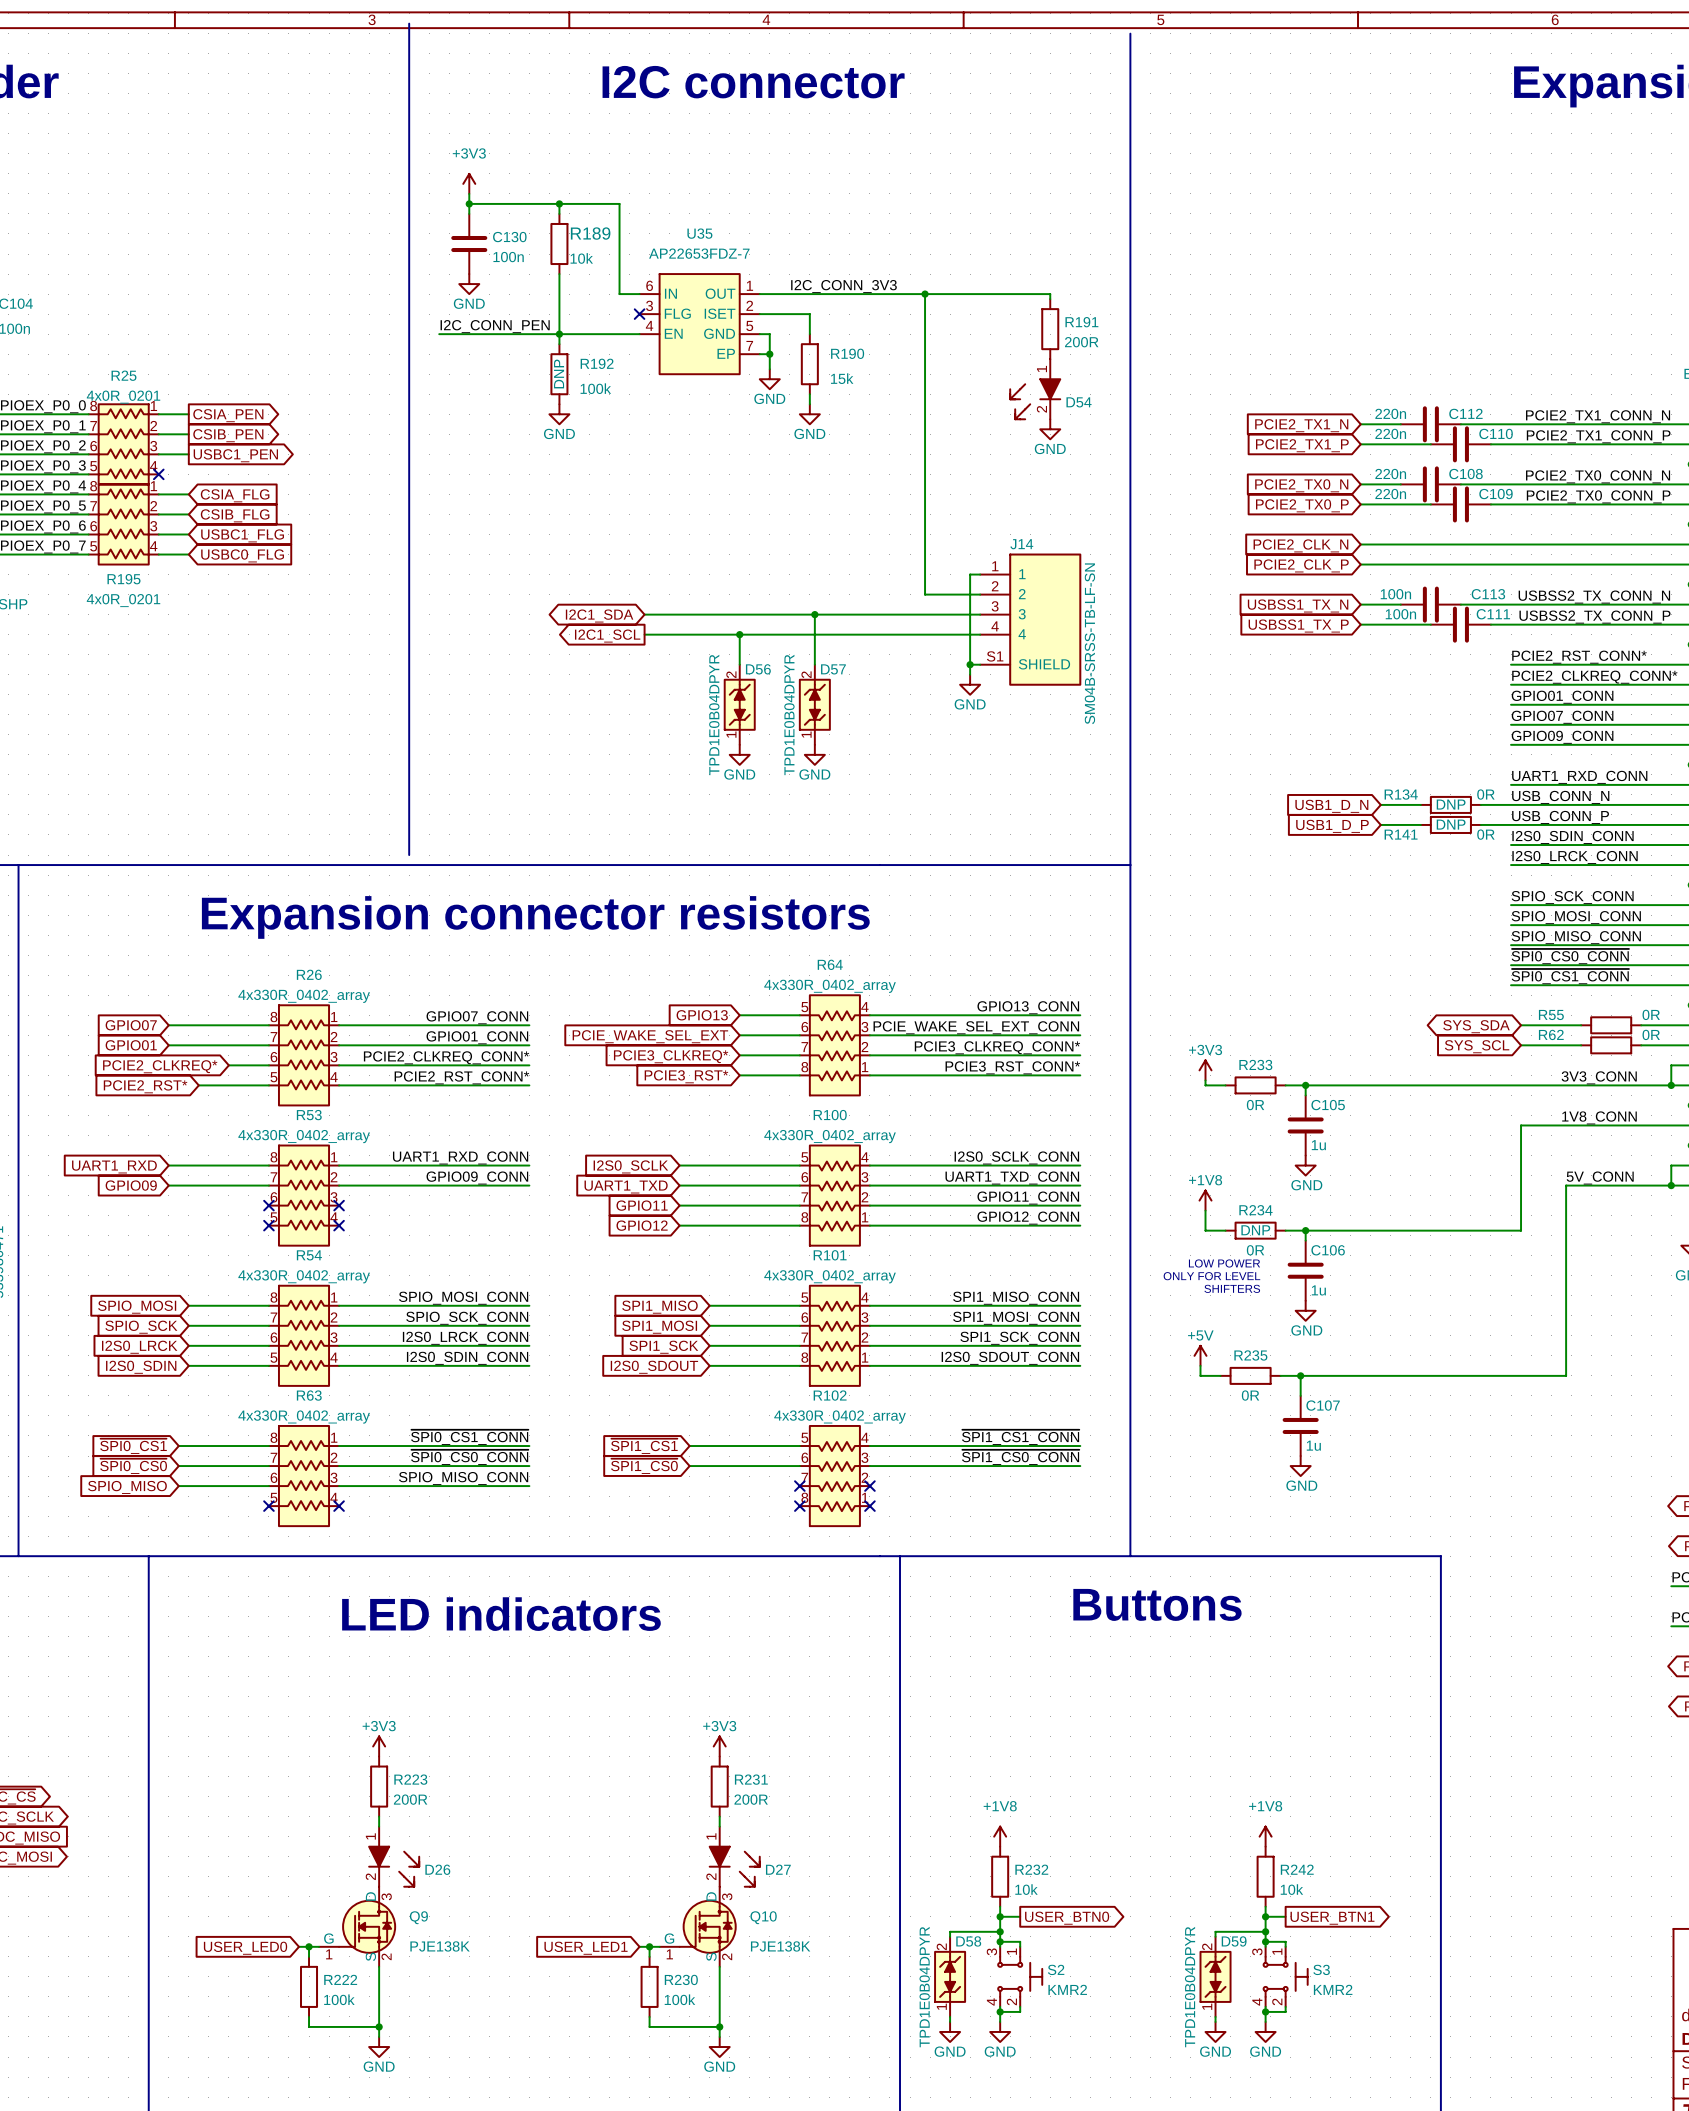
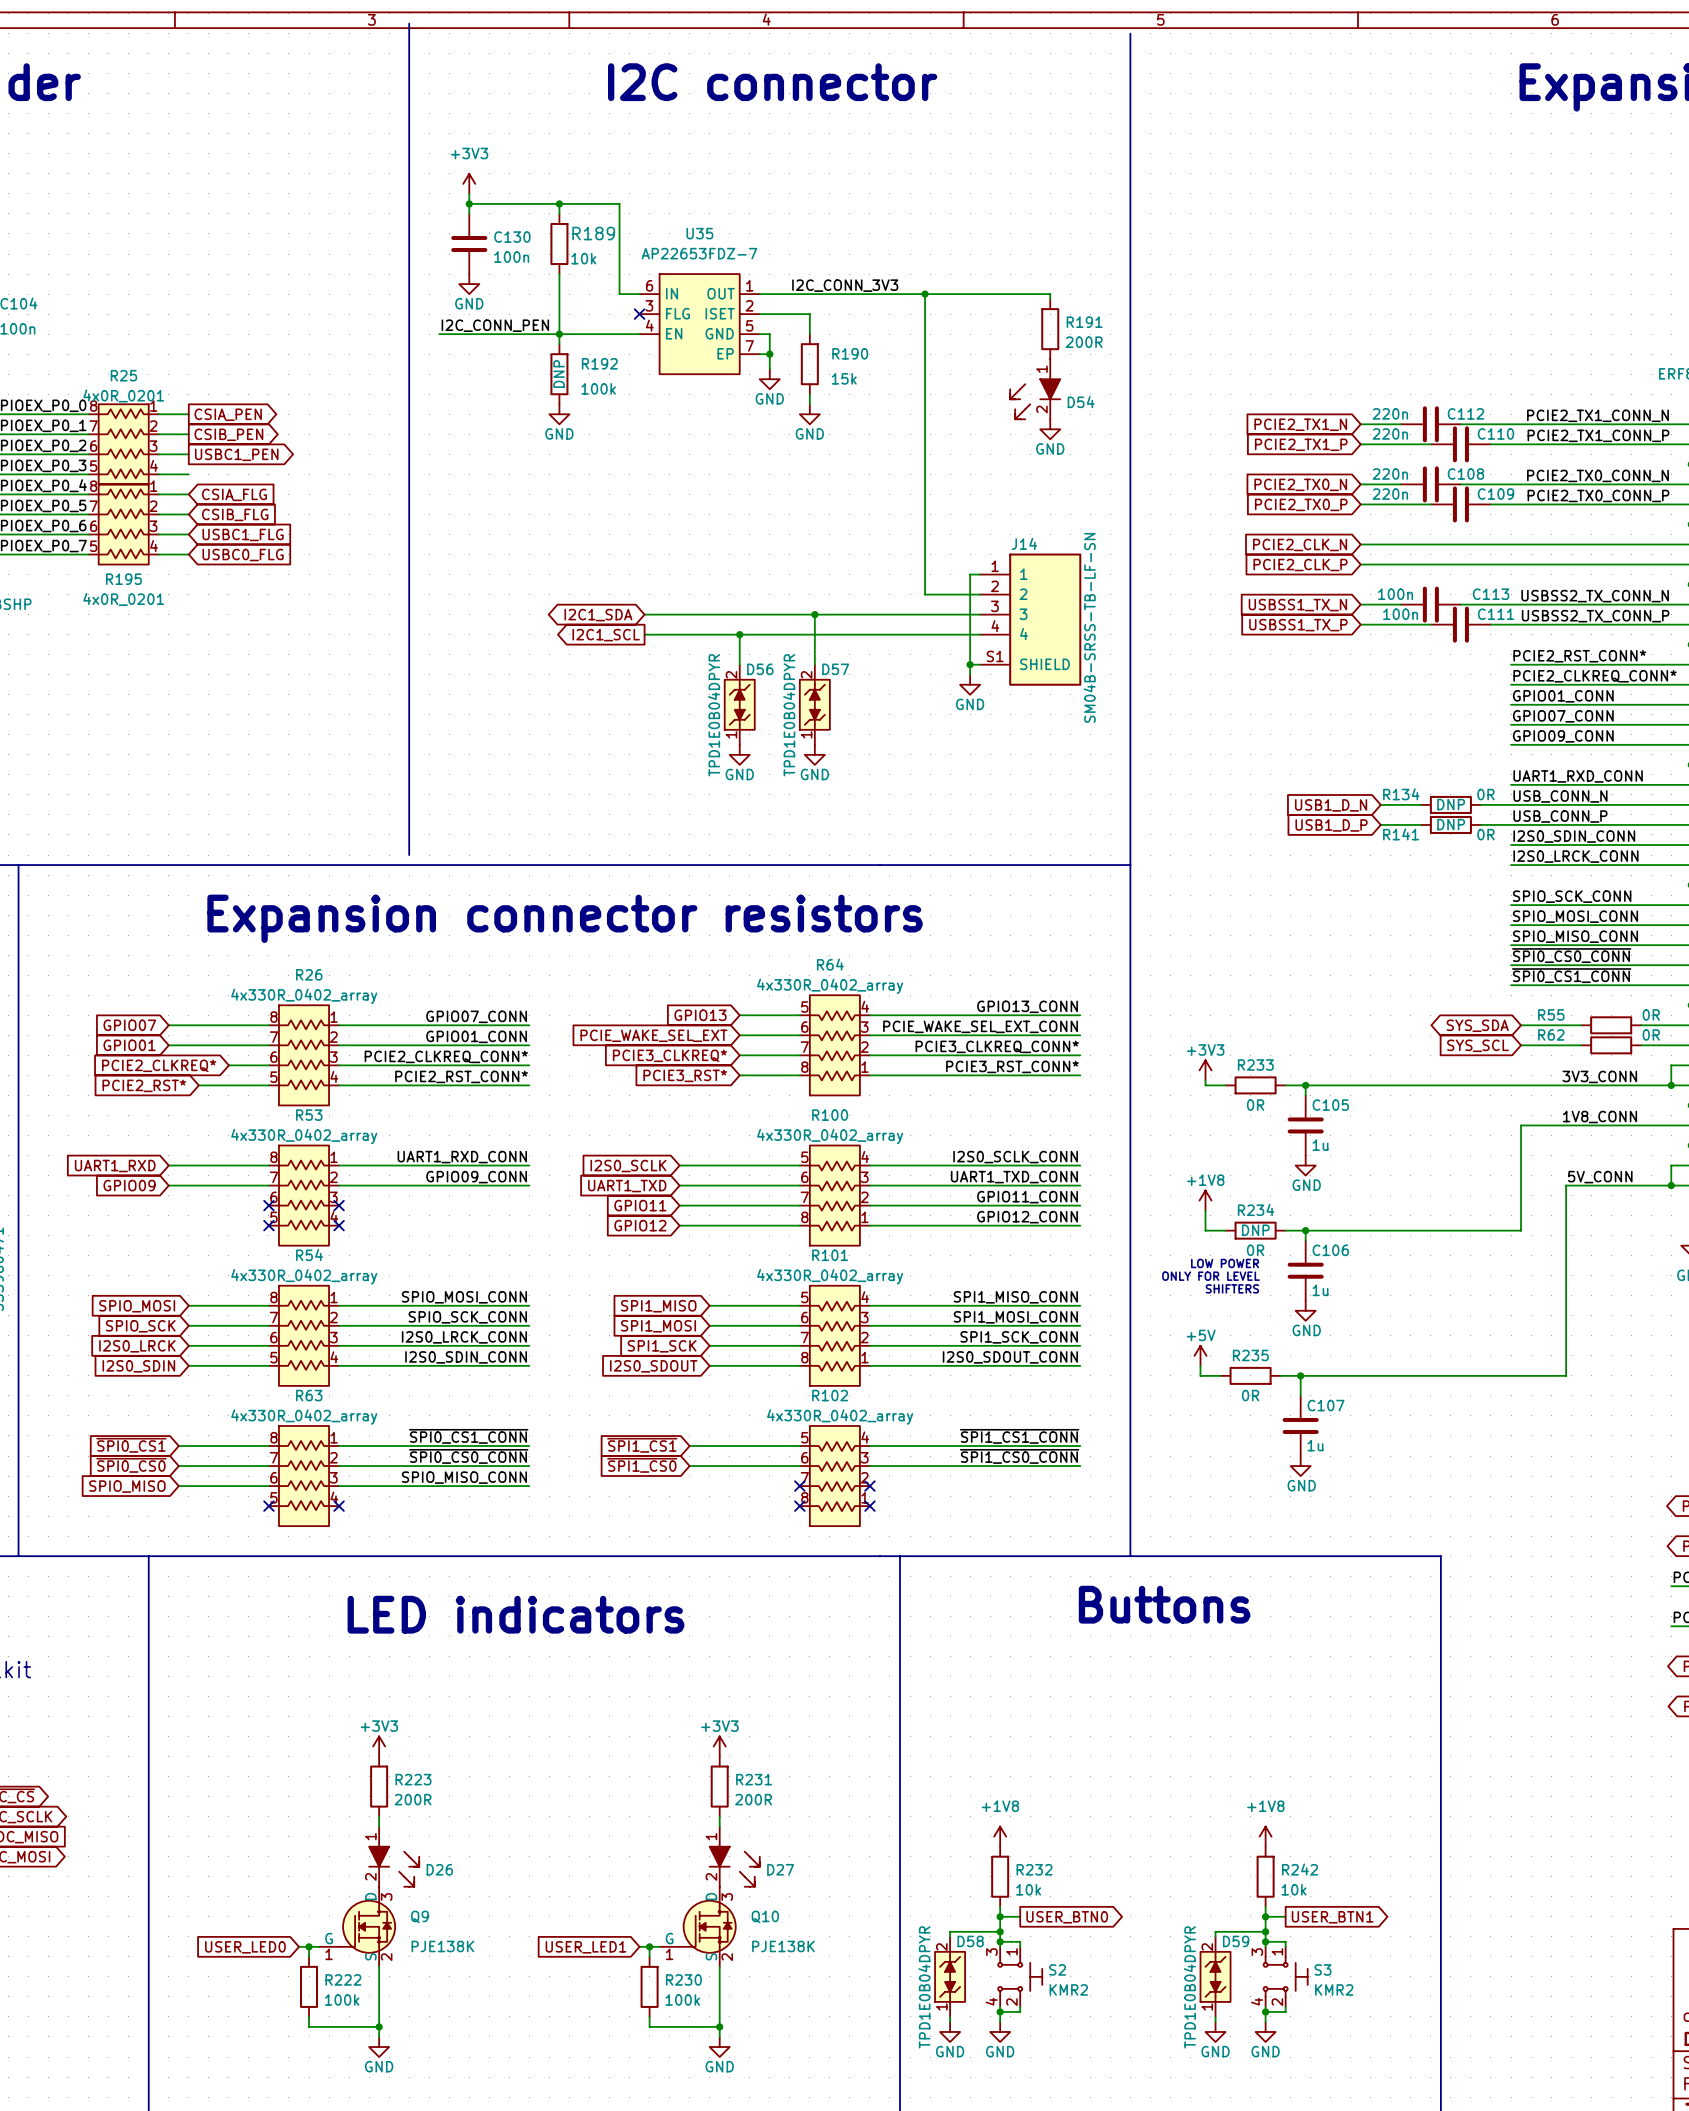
wire: none -> (158, 474) (188, 474)
no-connect mark: (158, 474) -> none

